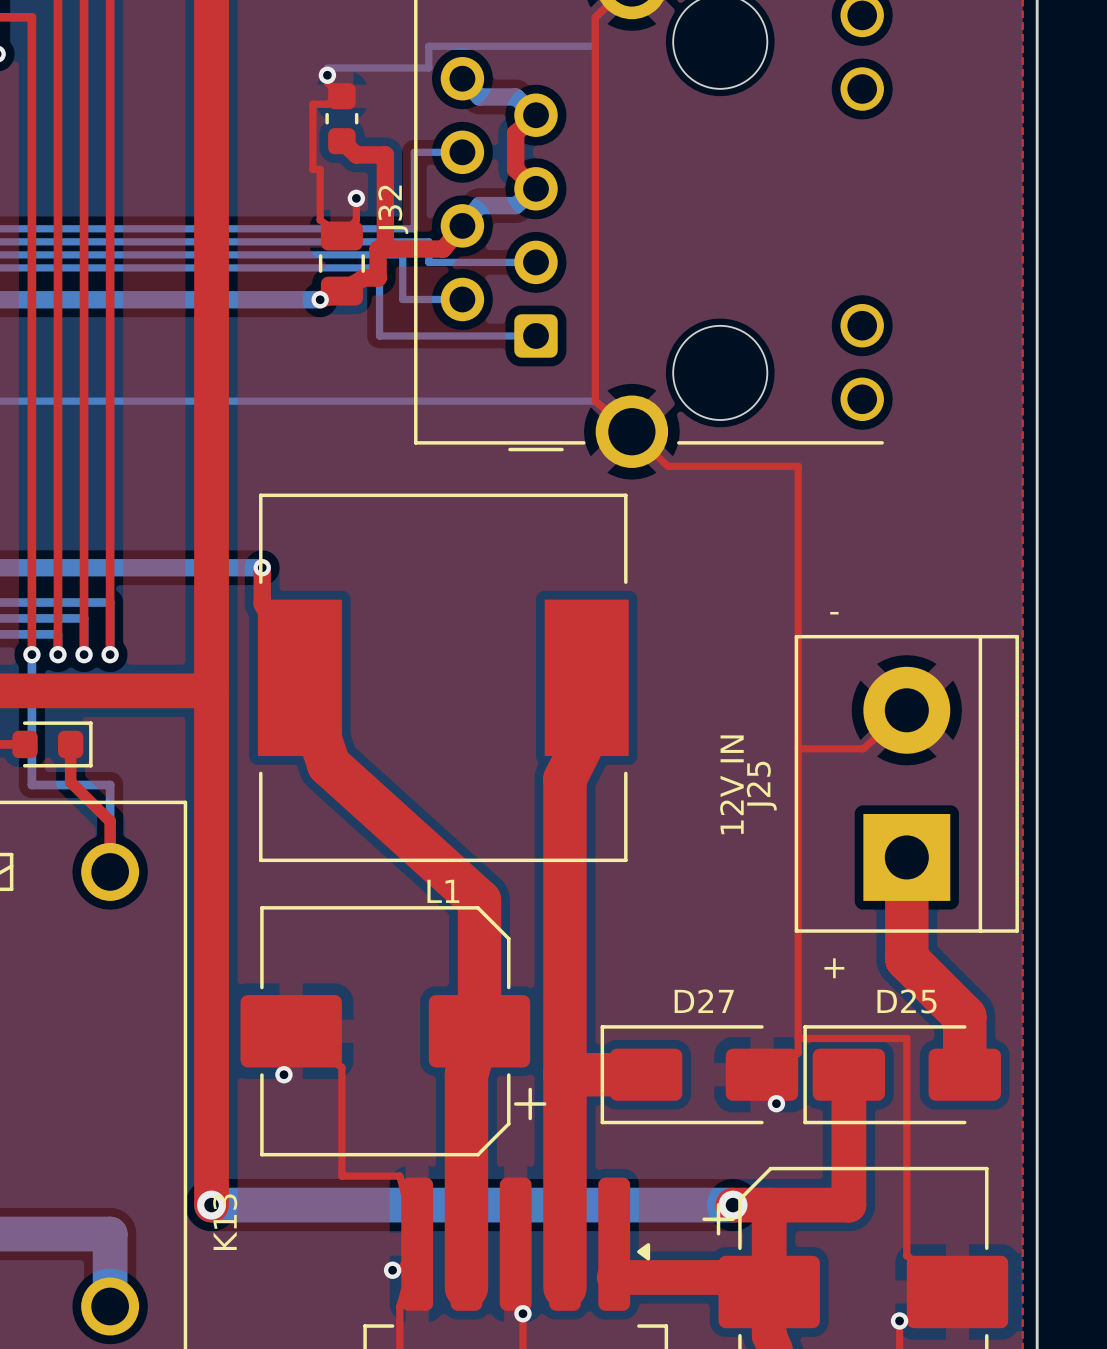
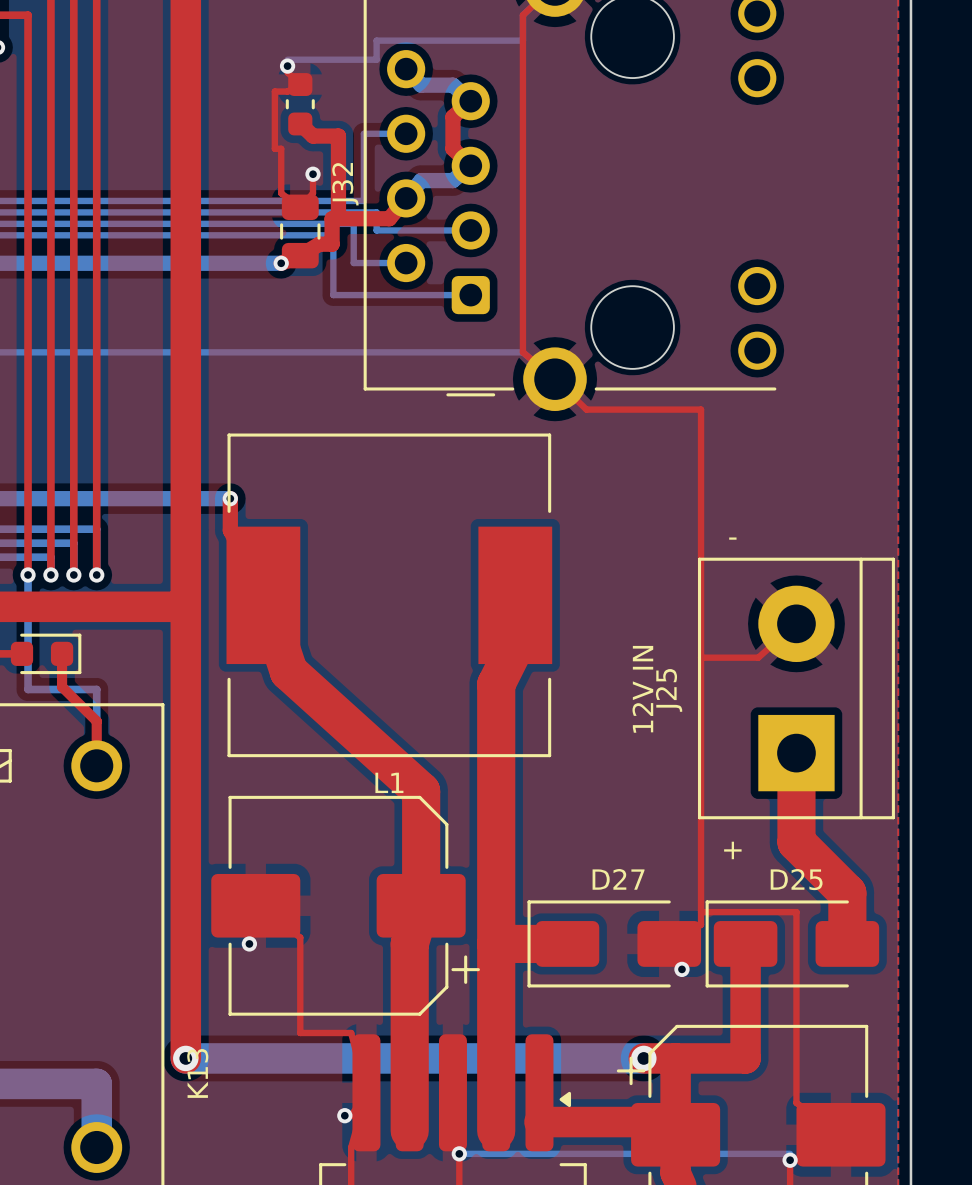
bottom track: none -> (465, 1153) (790, 1153)

